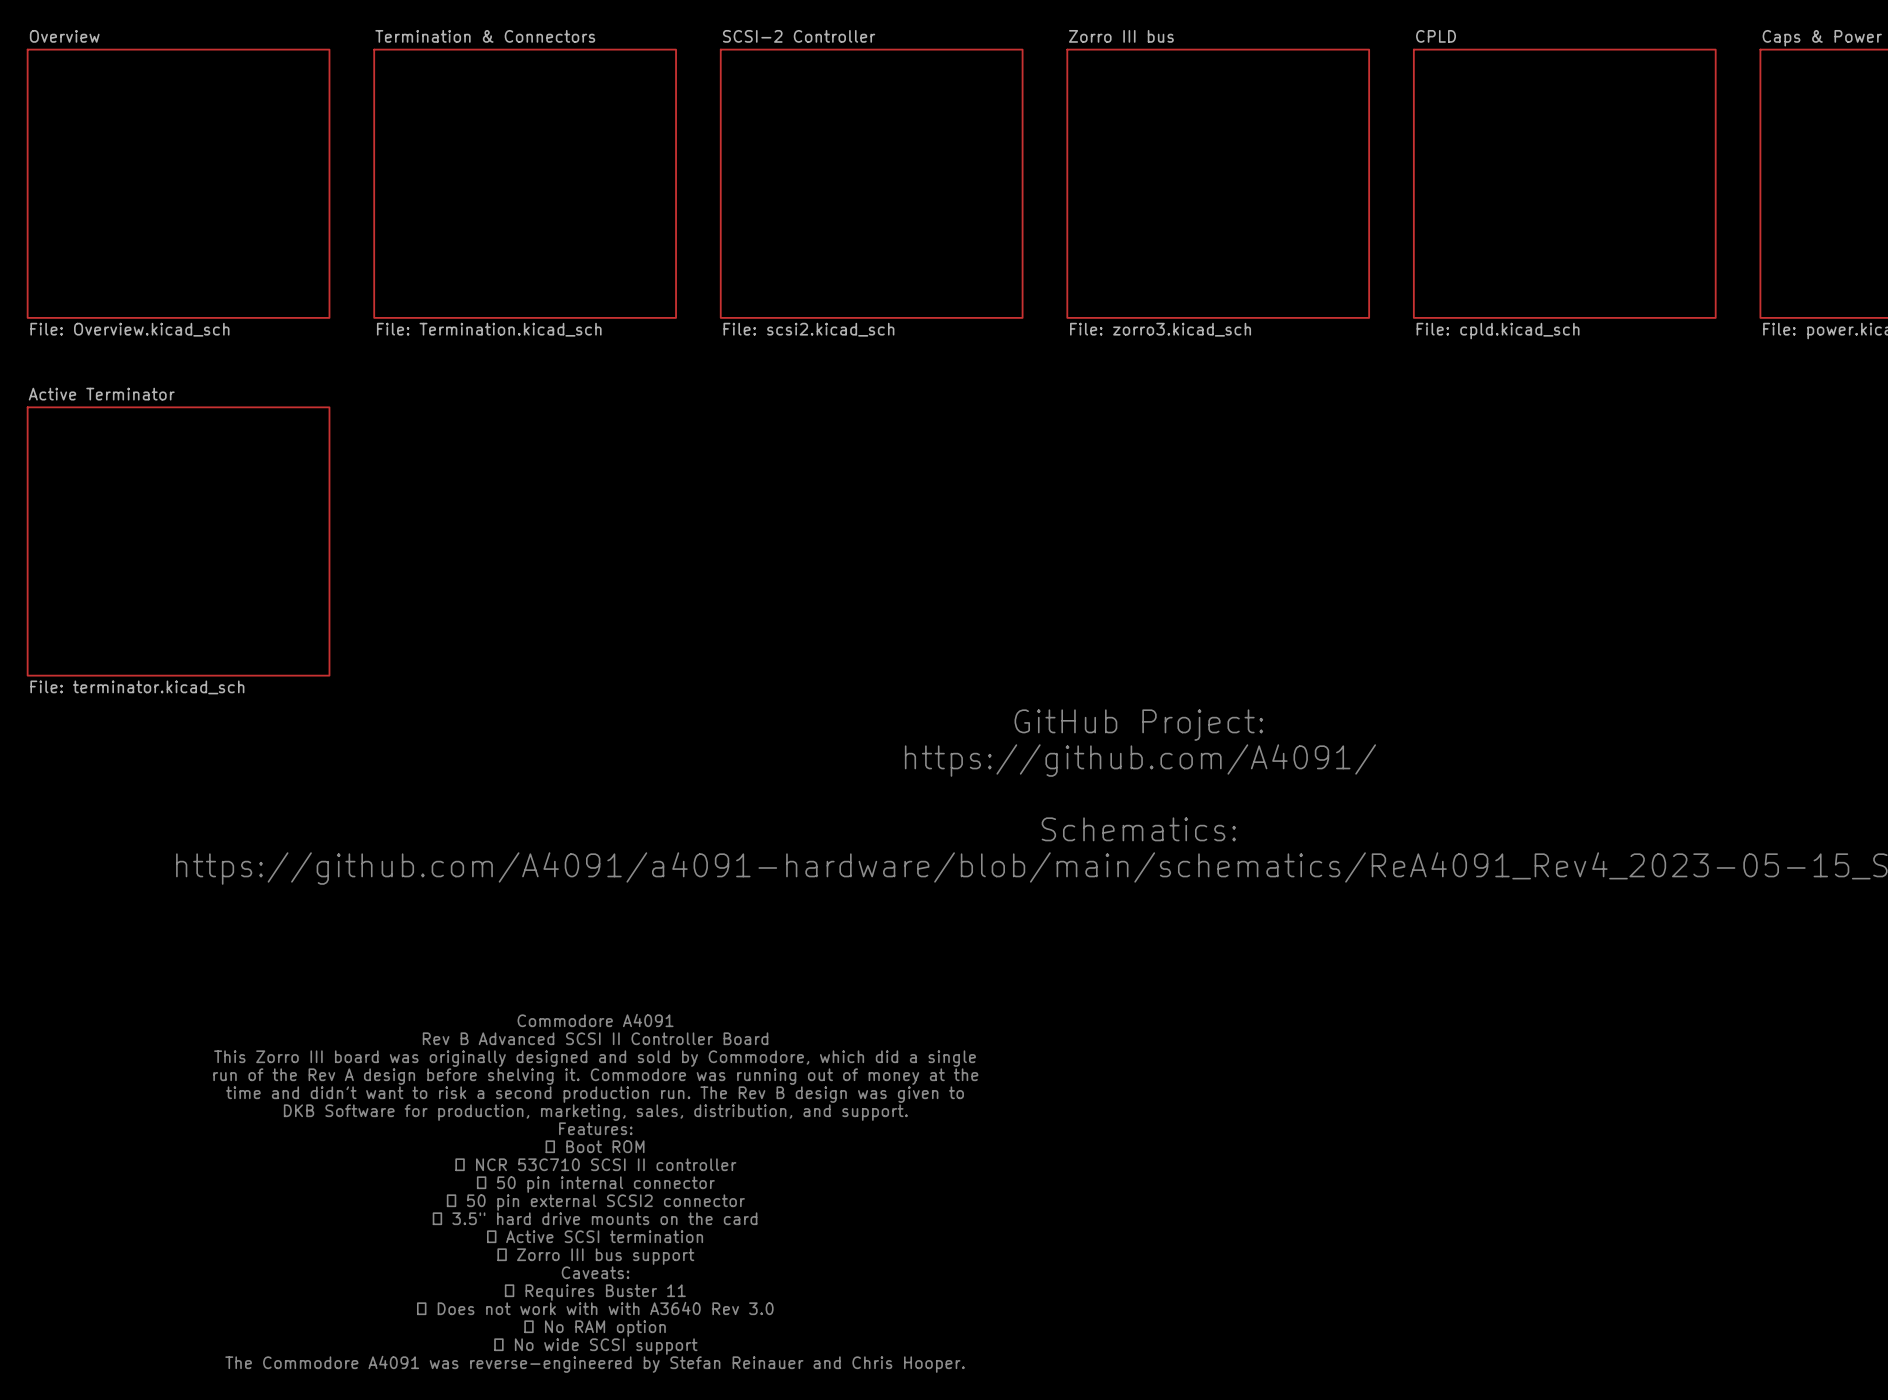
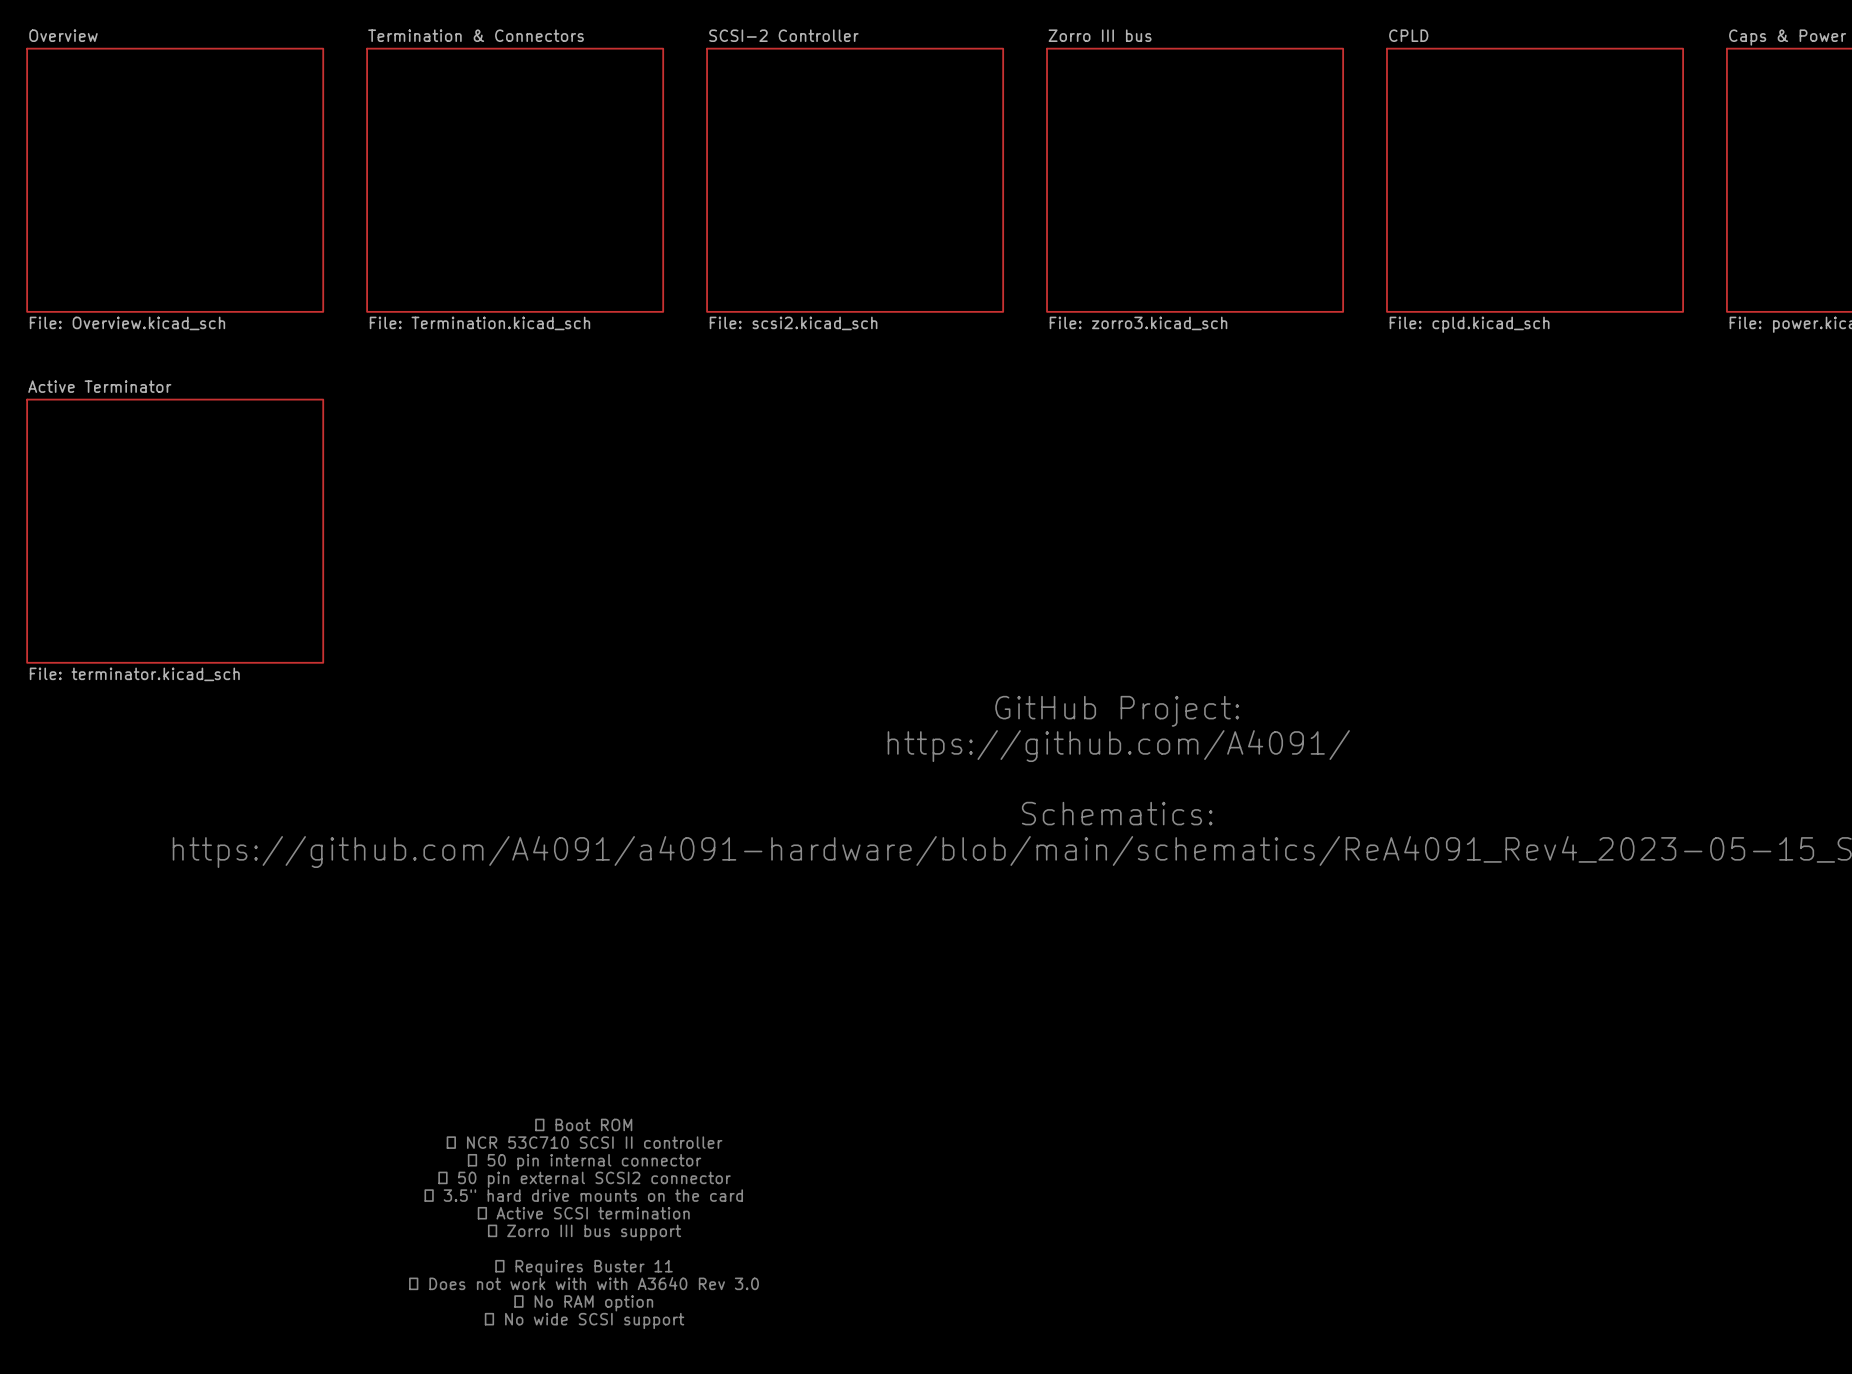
text: Commodore A4091 (595, 1020) -> none
text: Rev B Advanced SCSI II Controller Board (595, 1038) -> none
text: This Zorro III board was originally designed and sold by Commodore, which did a single (595, 1058) -> none
text: run of the Rev A design before shelving it. Commodore was running out of money at the (595, 1076) -> none
text: time and didn't want to risk a second production run. The Rev B design was given to (595, 1094) -> none
text: DKB Software for production, marketing, sales, distribution, and support. (595, 1112) -> none
text: Features: (595, 1128) -> none
text: Caveats: (595, 1272) -> none
text: The Commodore A4091 was reverse-engineered by Stefan Reinauer and Chris Hooper. (595, 1364) -> none

